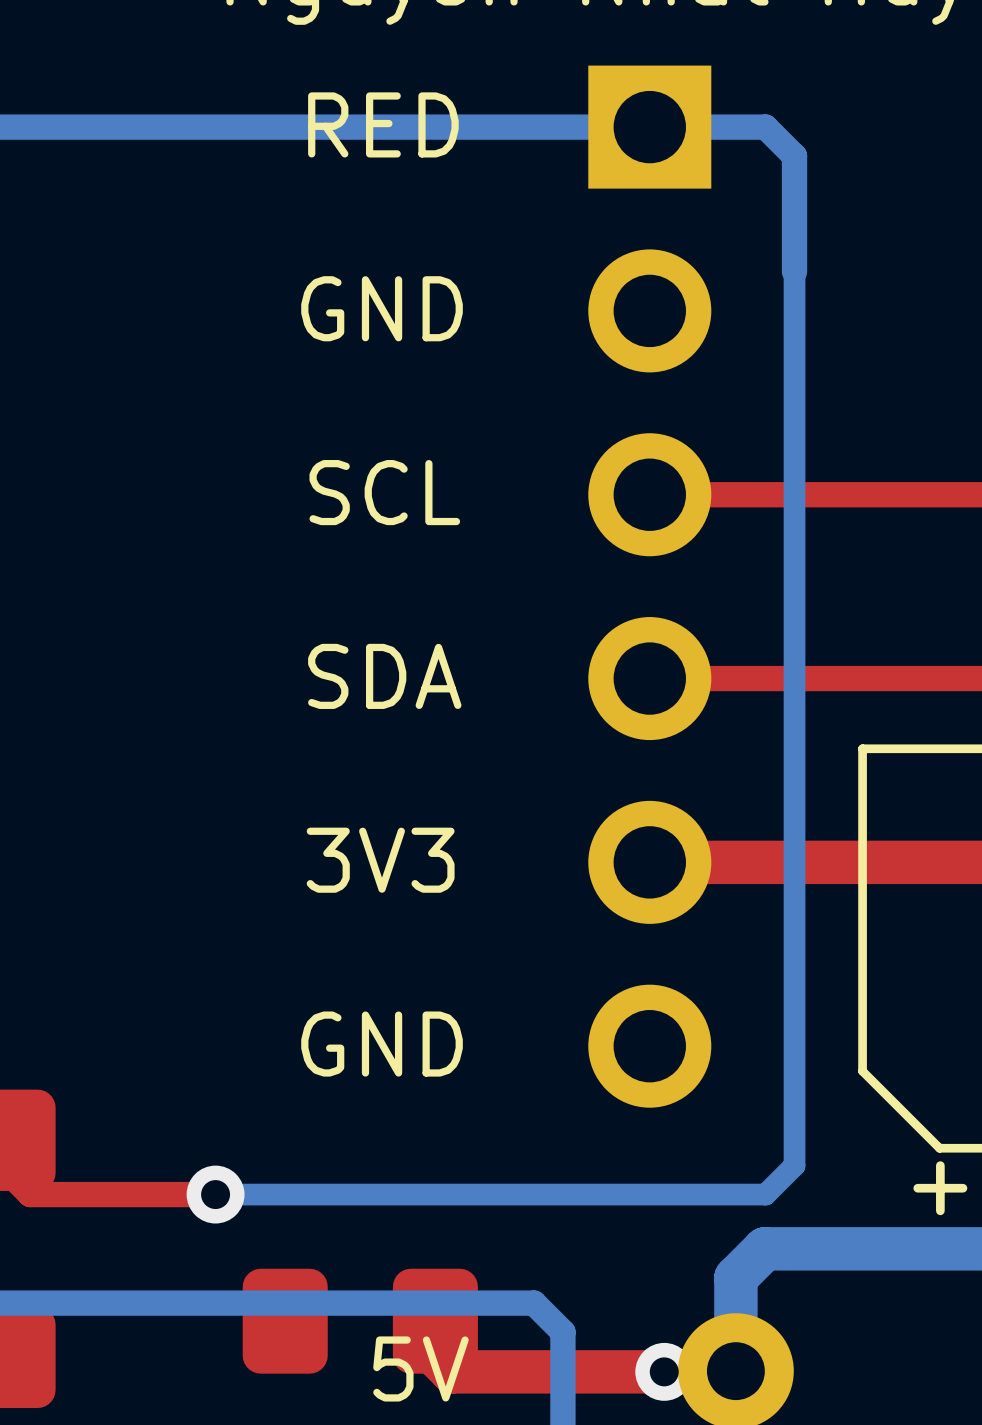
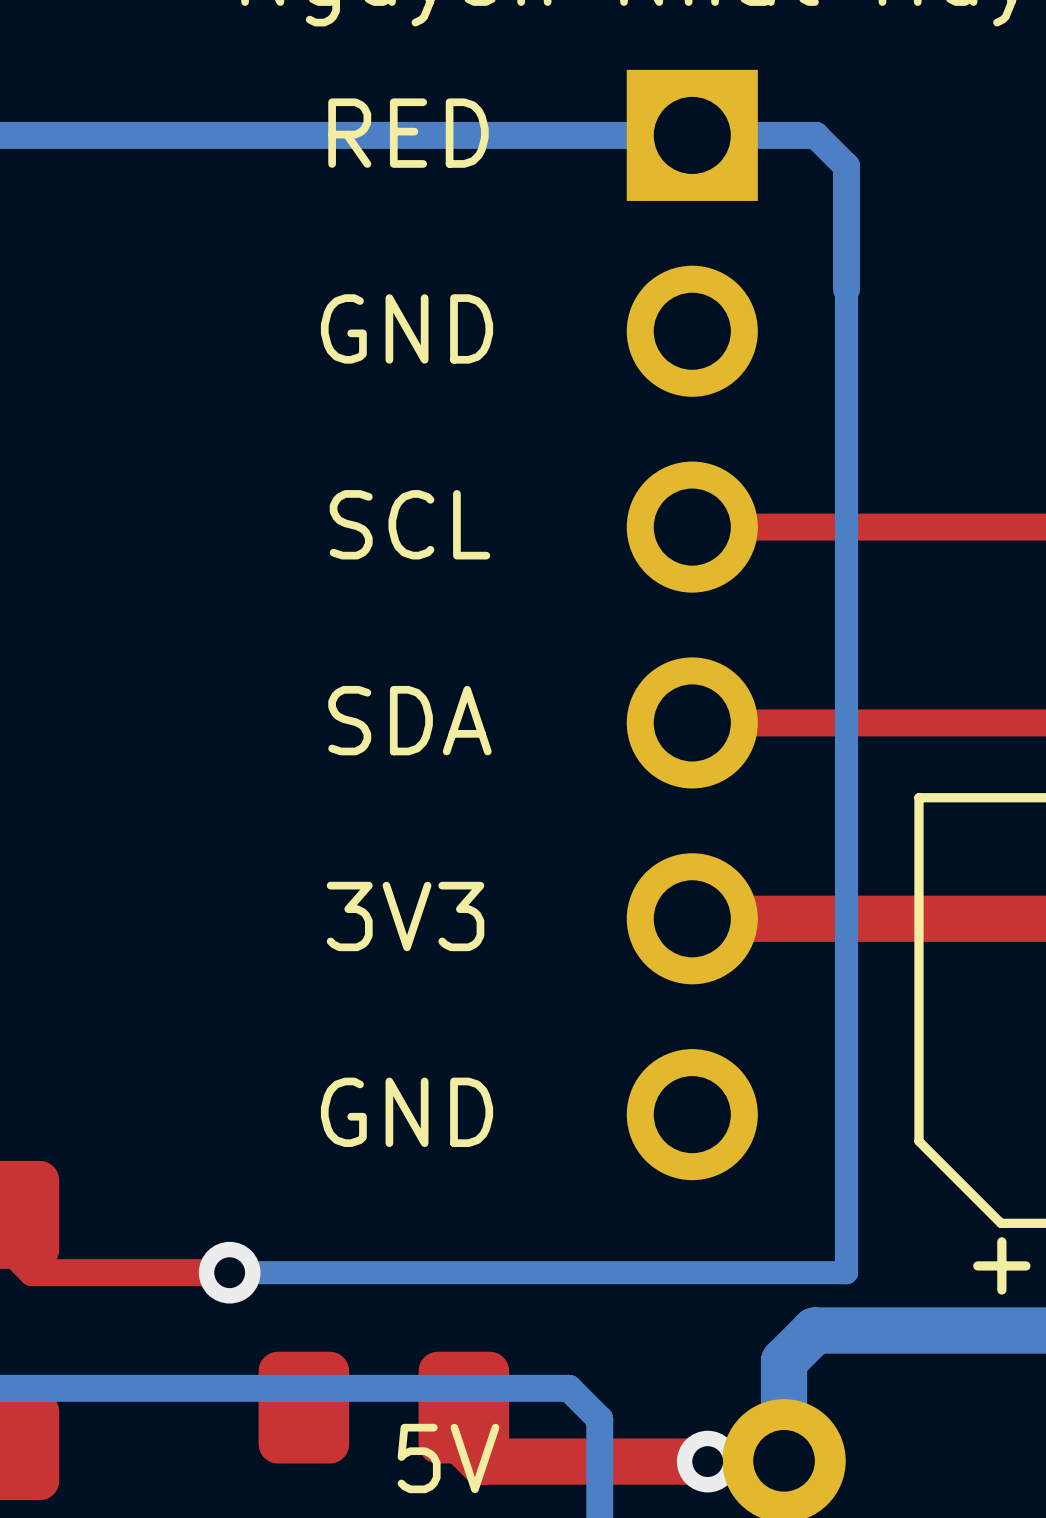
bottom track: (794, 1165) (765, 1194) -> (846, 1241) (846, 1272) (815, 1272)

